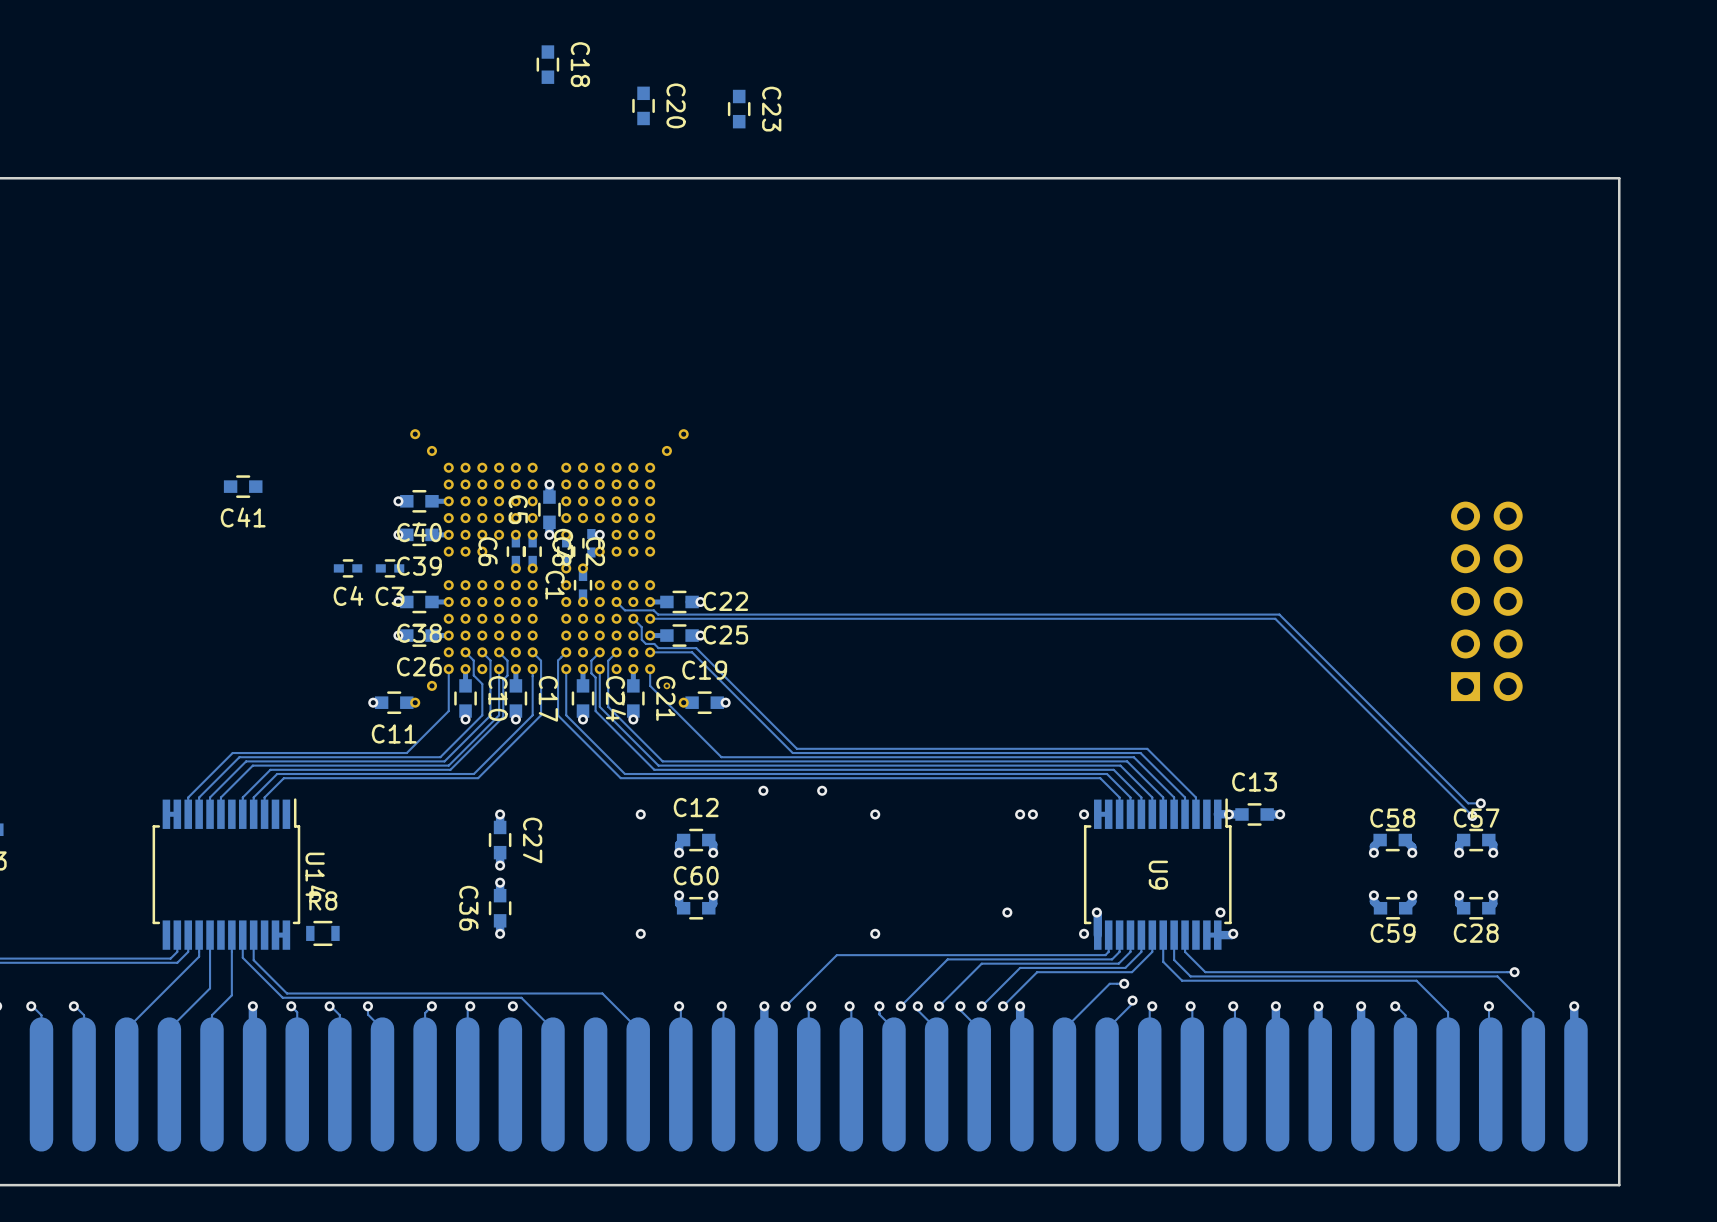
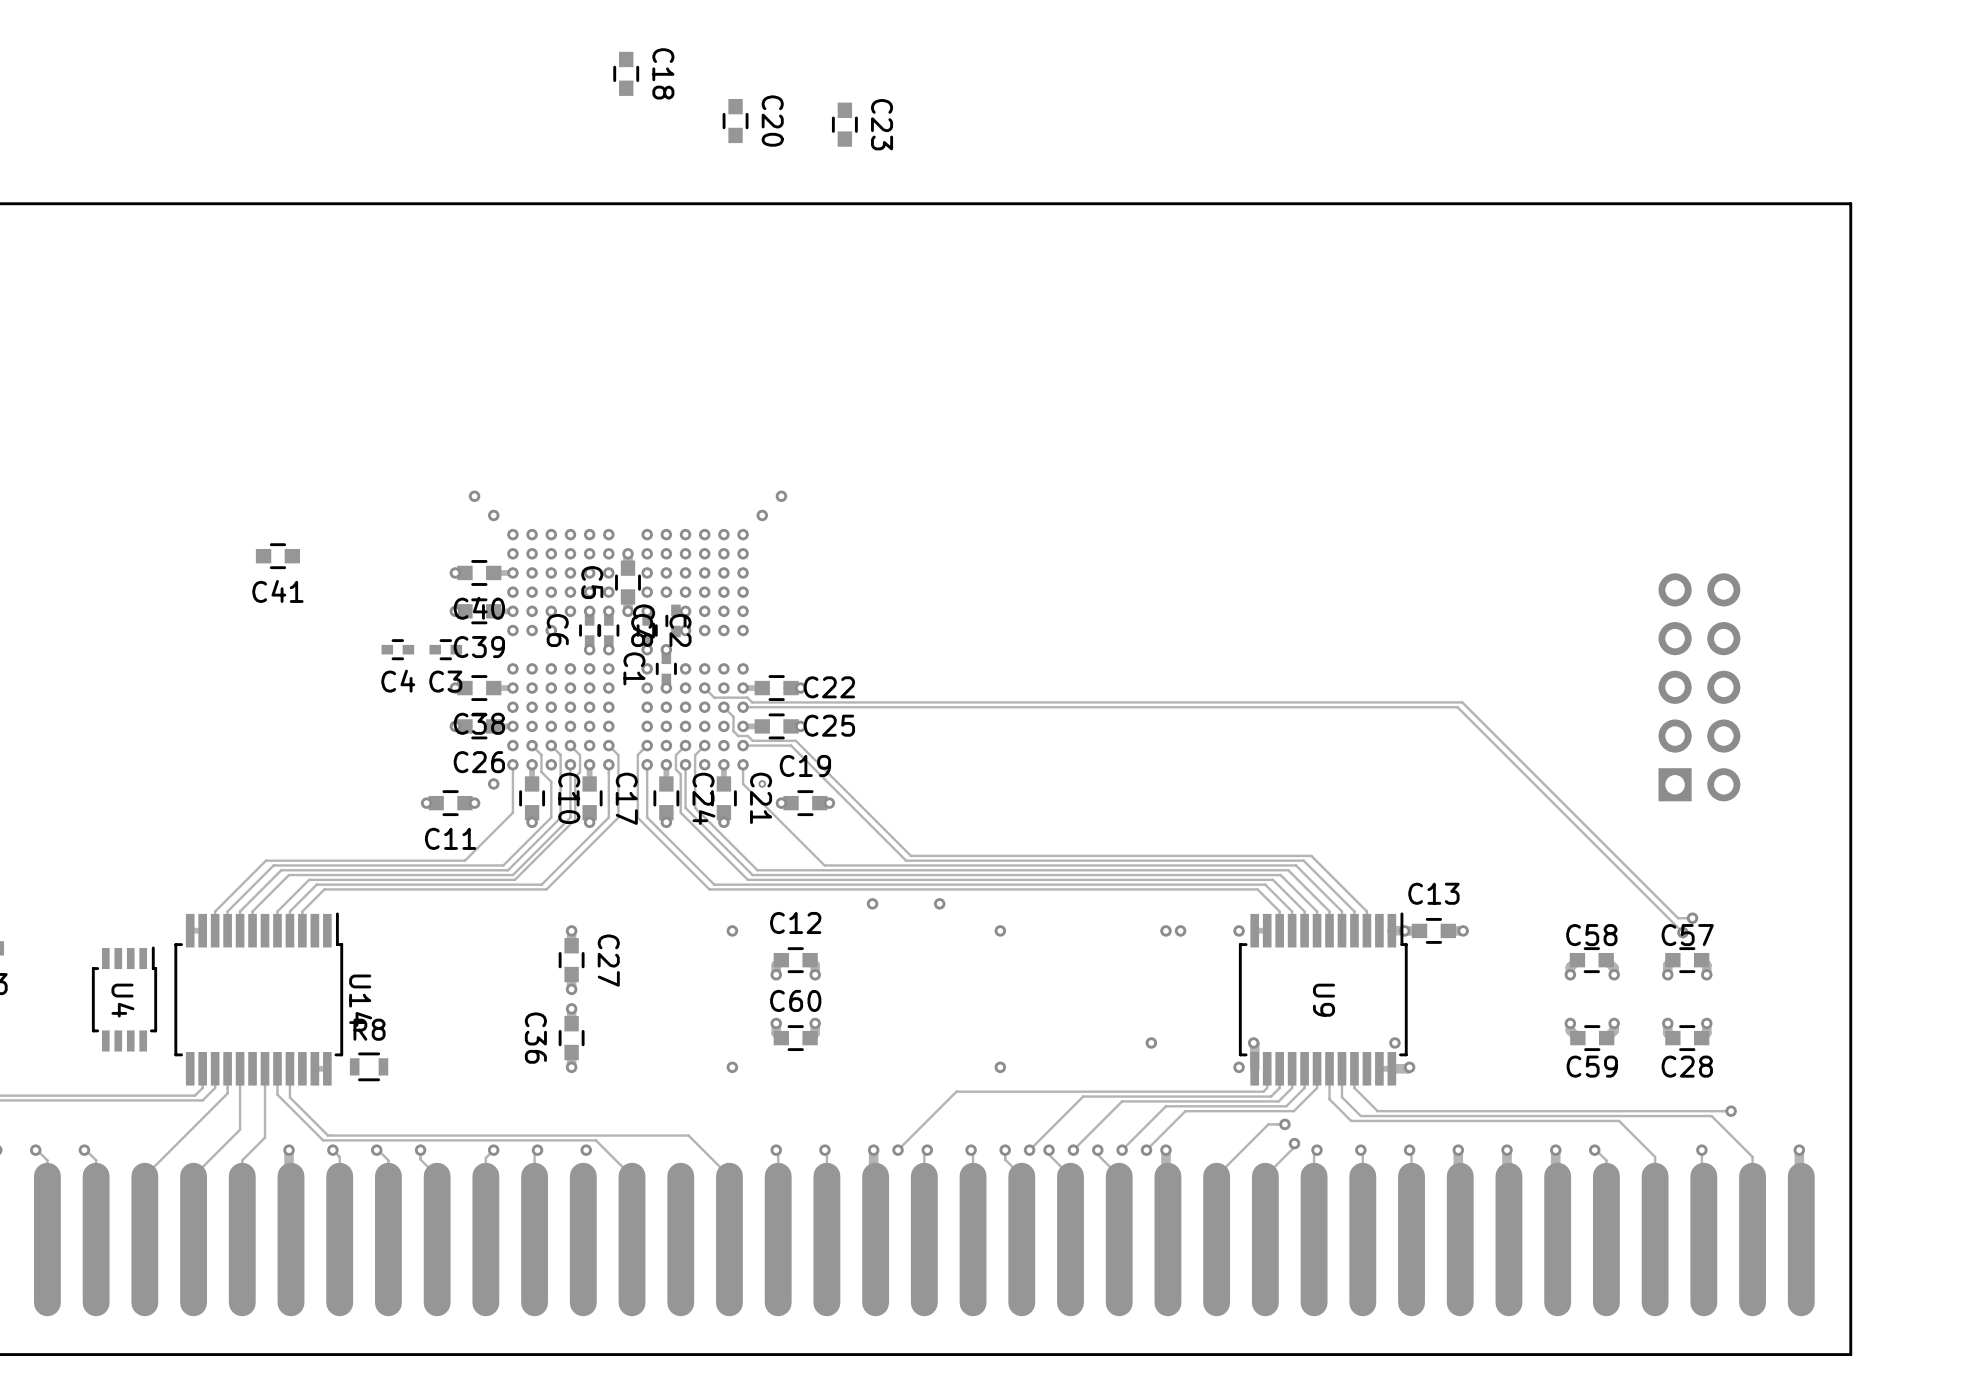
U4: none -> (124, 999)

